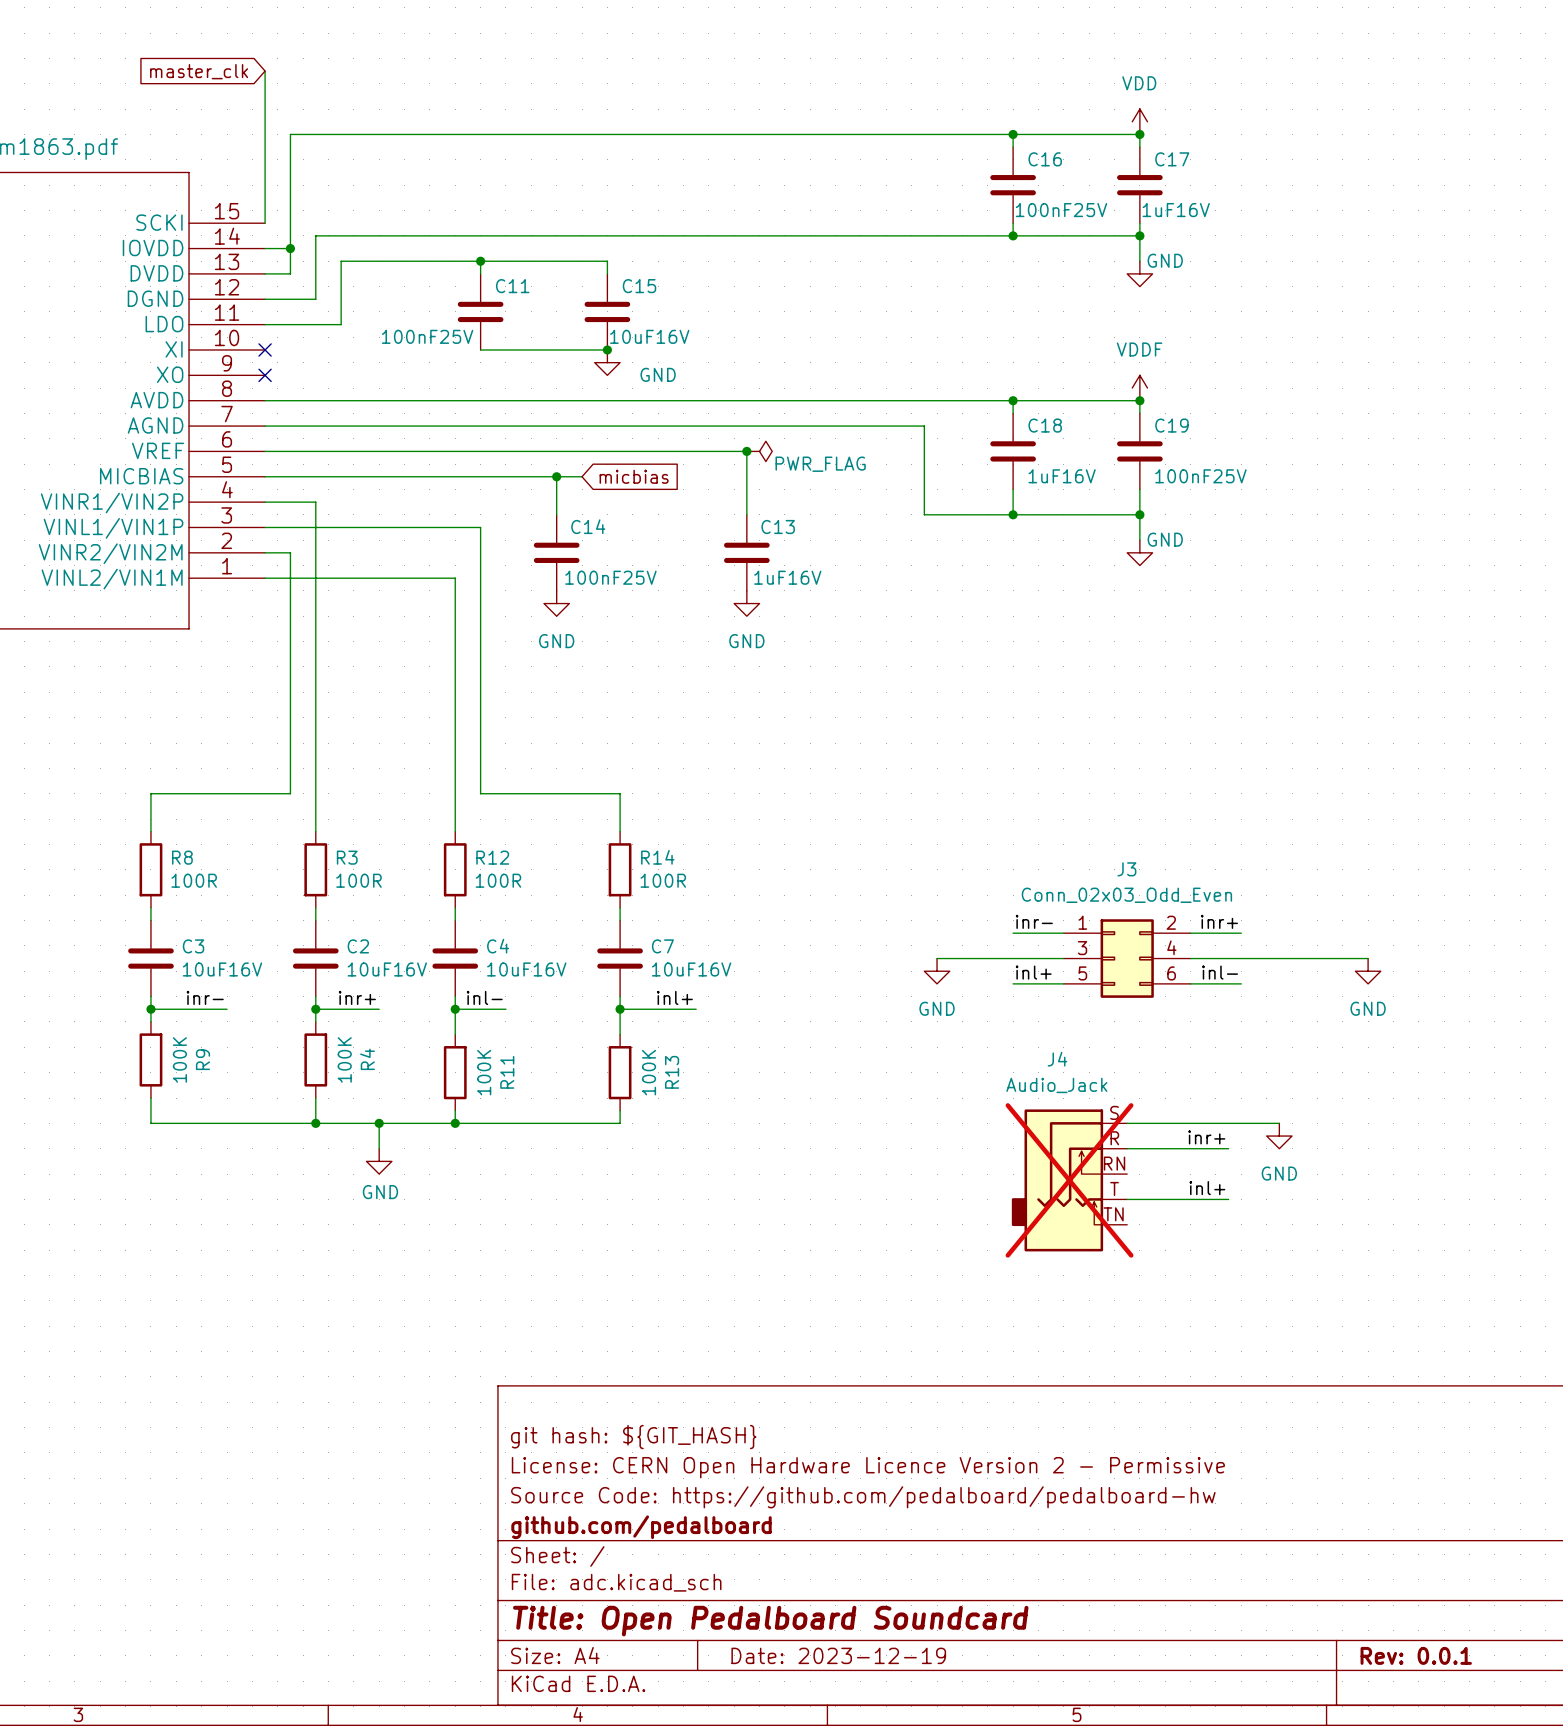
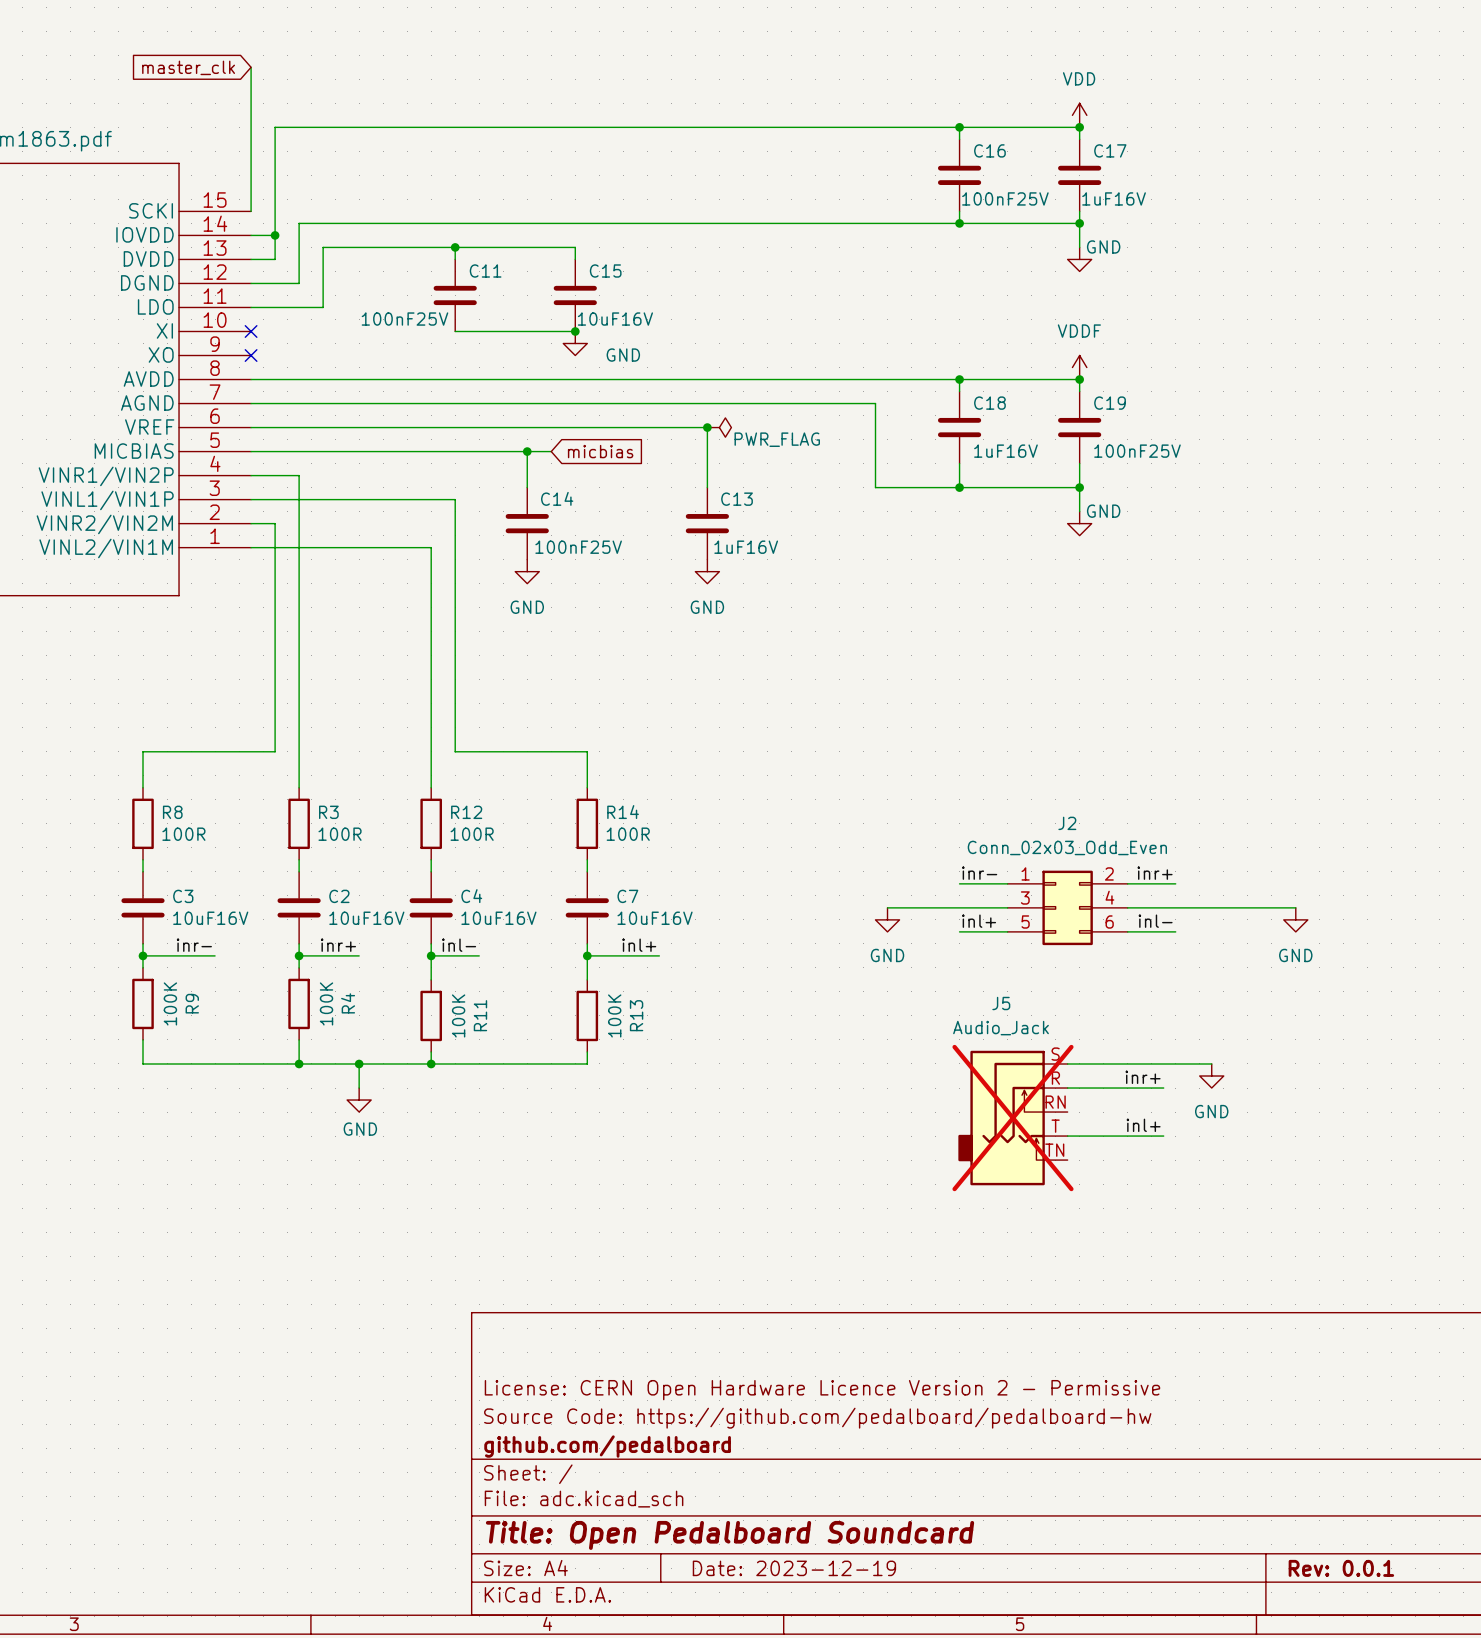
J3 name: J3 (1126, 869) -> J2 (1067, 823)
J4 name: J4 (1057, 1059) -> J5 (1001, 1003)
title block: git hash: ${GIT_HASH} (633, 1437) -> none

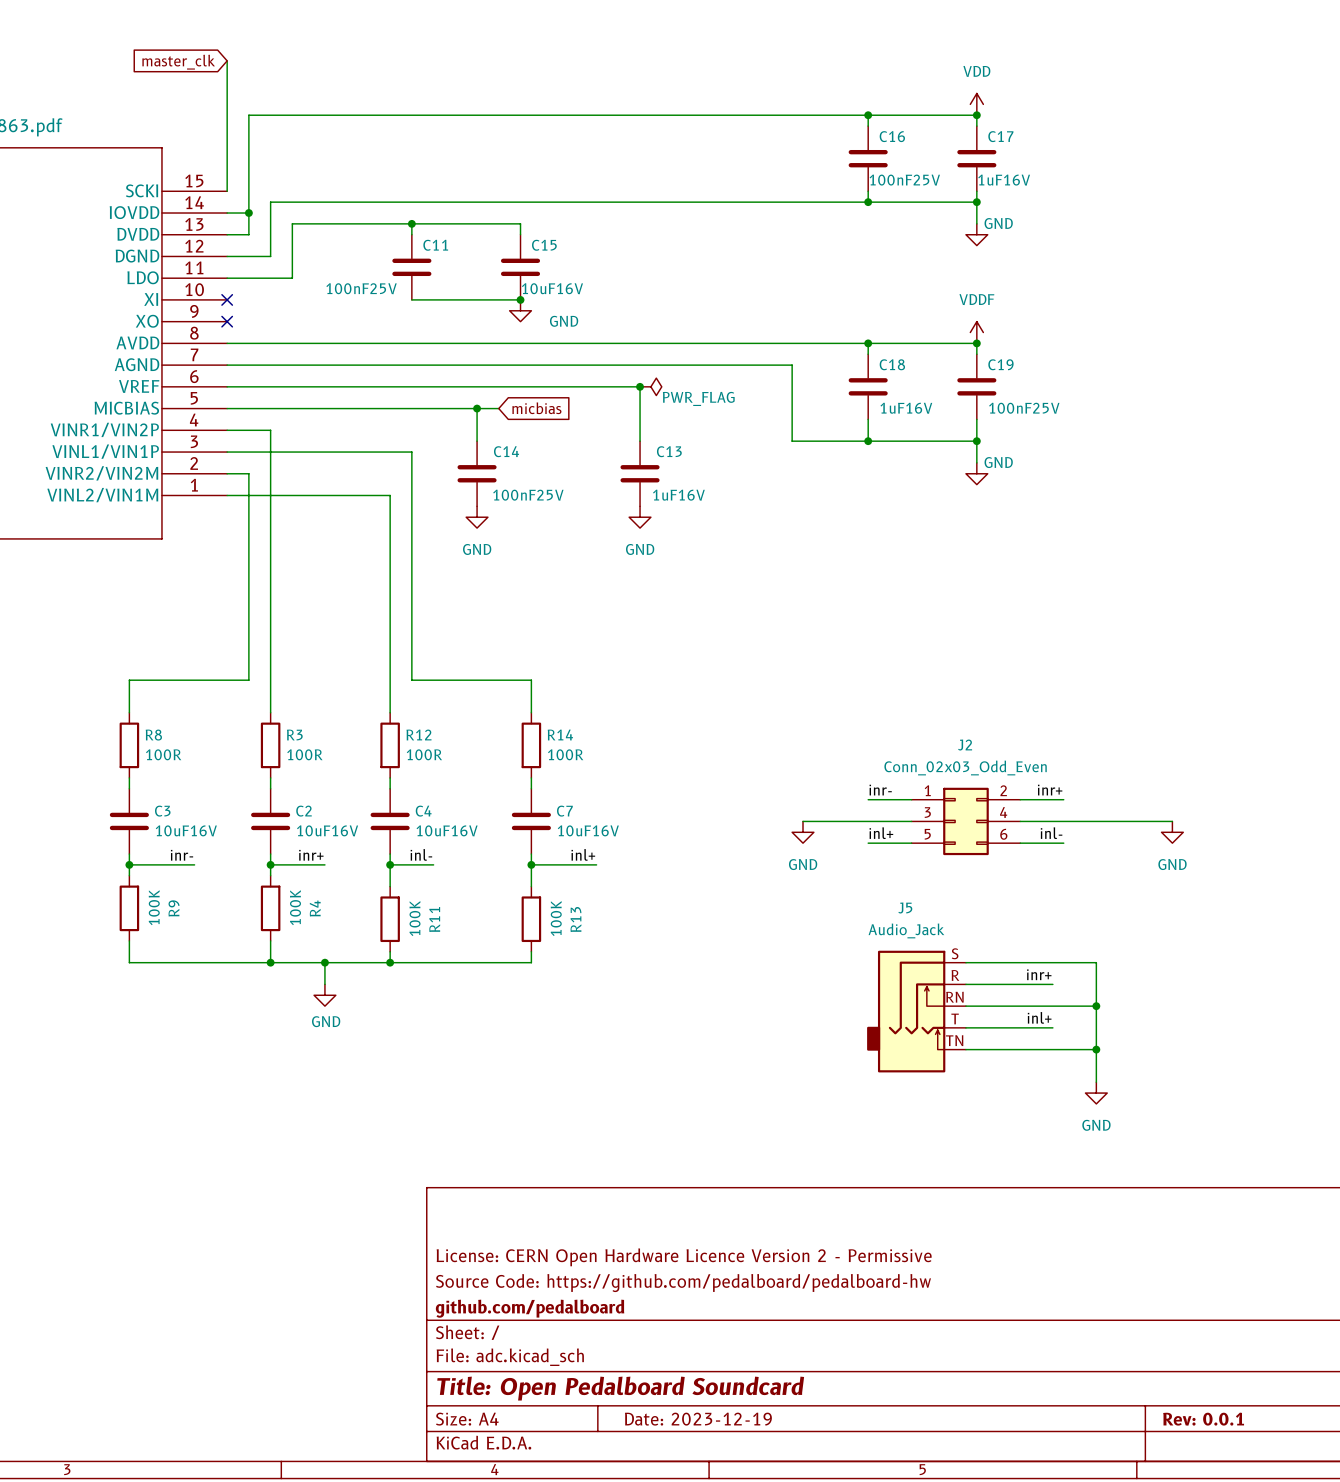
wire: none -> (1096, 962) (1096, 1082)
power symbol position: GND (1211, 1076) -> GND (1096, 1093)
wire: none -> (965, 1006) (1096, 1006)
junction: none -> (1096, 1006)
J5 do-not-place cross: (1013, 1118) -> none
wire: none -> (965, 1049) (1096, 1049)
junction: none -> (1096, 1049)

